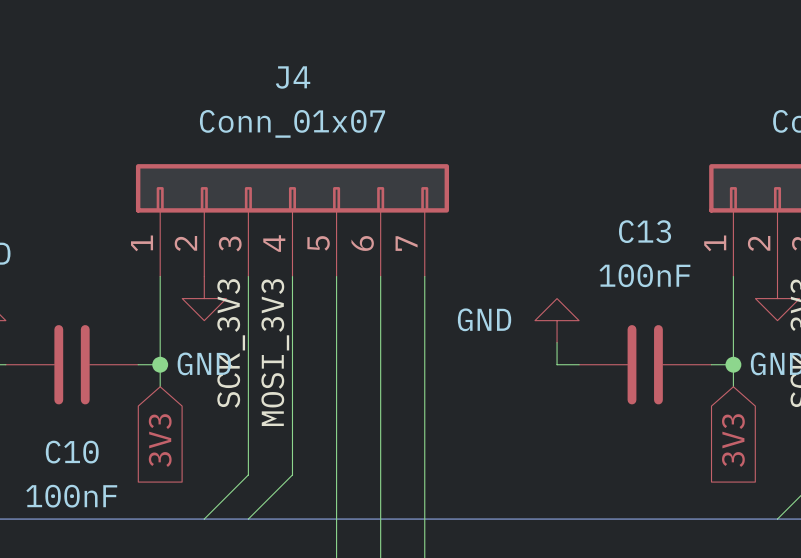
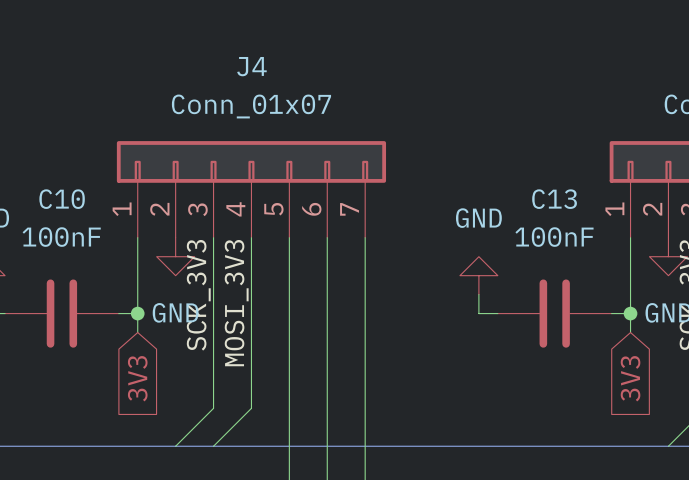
power symbol text position: GND (484, 319) -> GND (478, 218)
C10 name position: C10 (72, 452) -> C10 (62, 199)
C10 value position: 100nF (71, 496) -> 100nF (61, 237)

